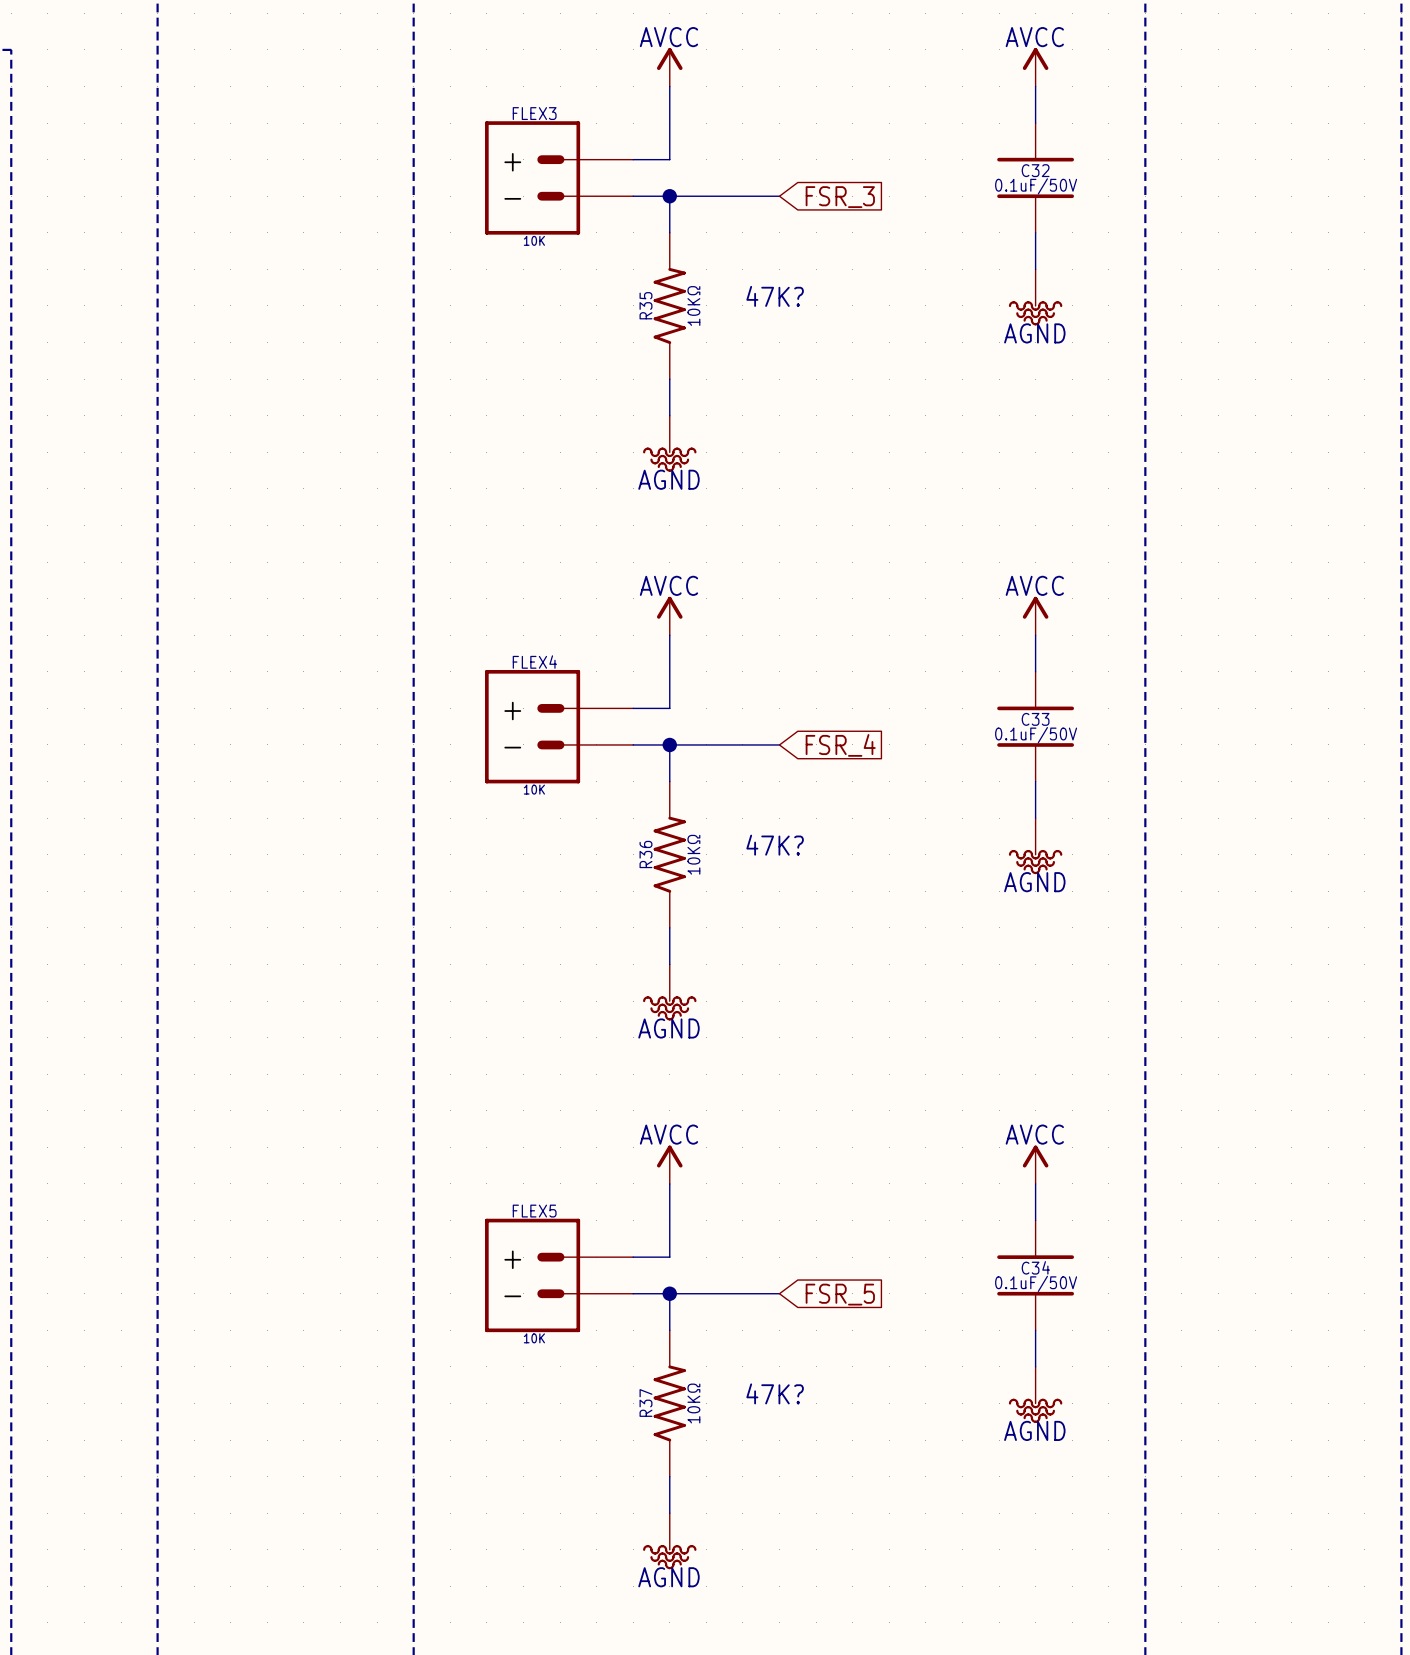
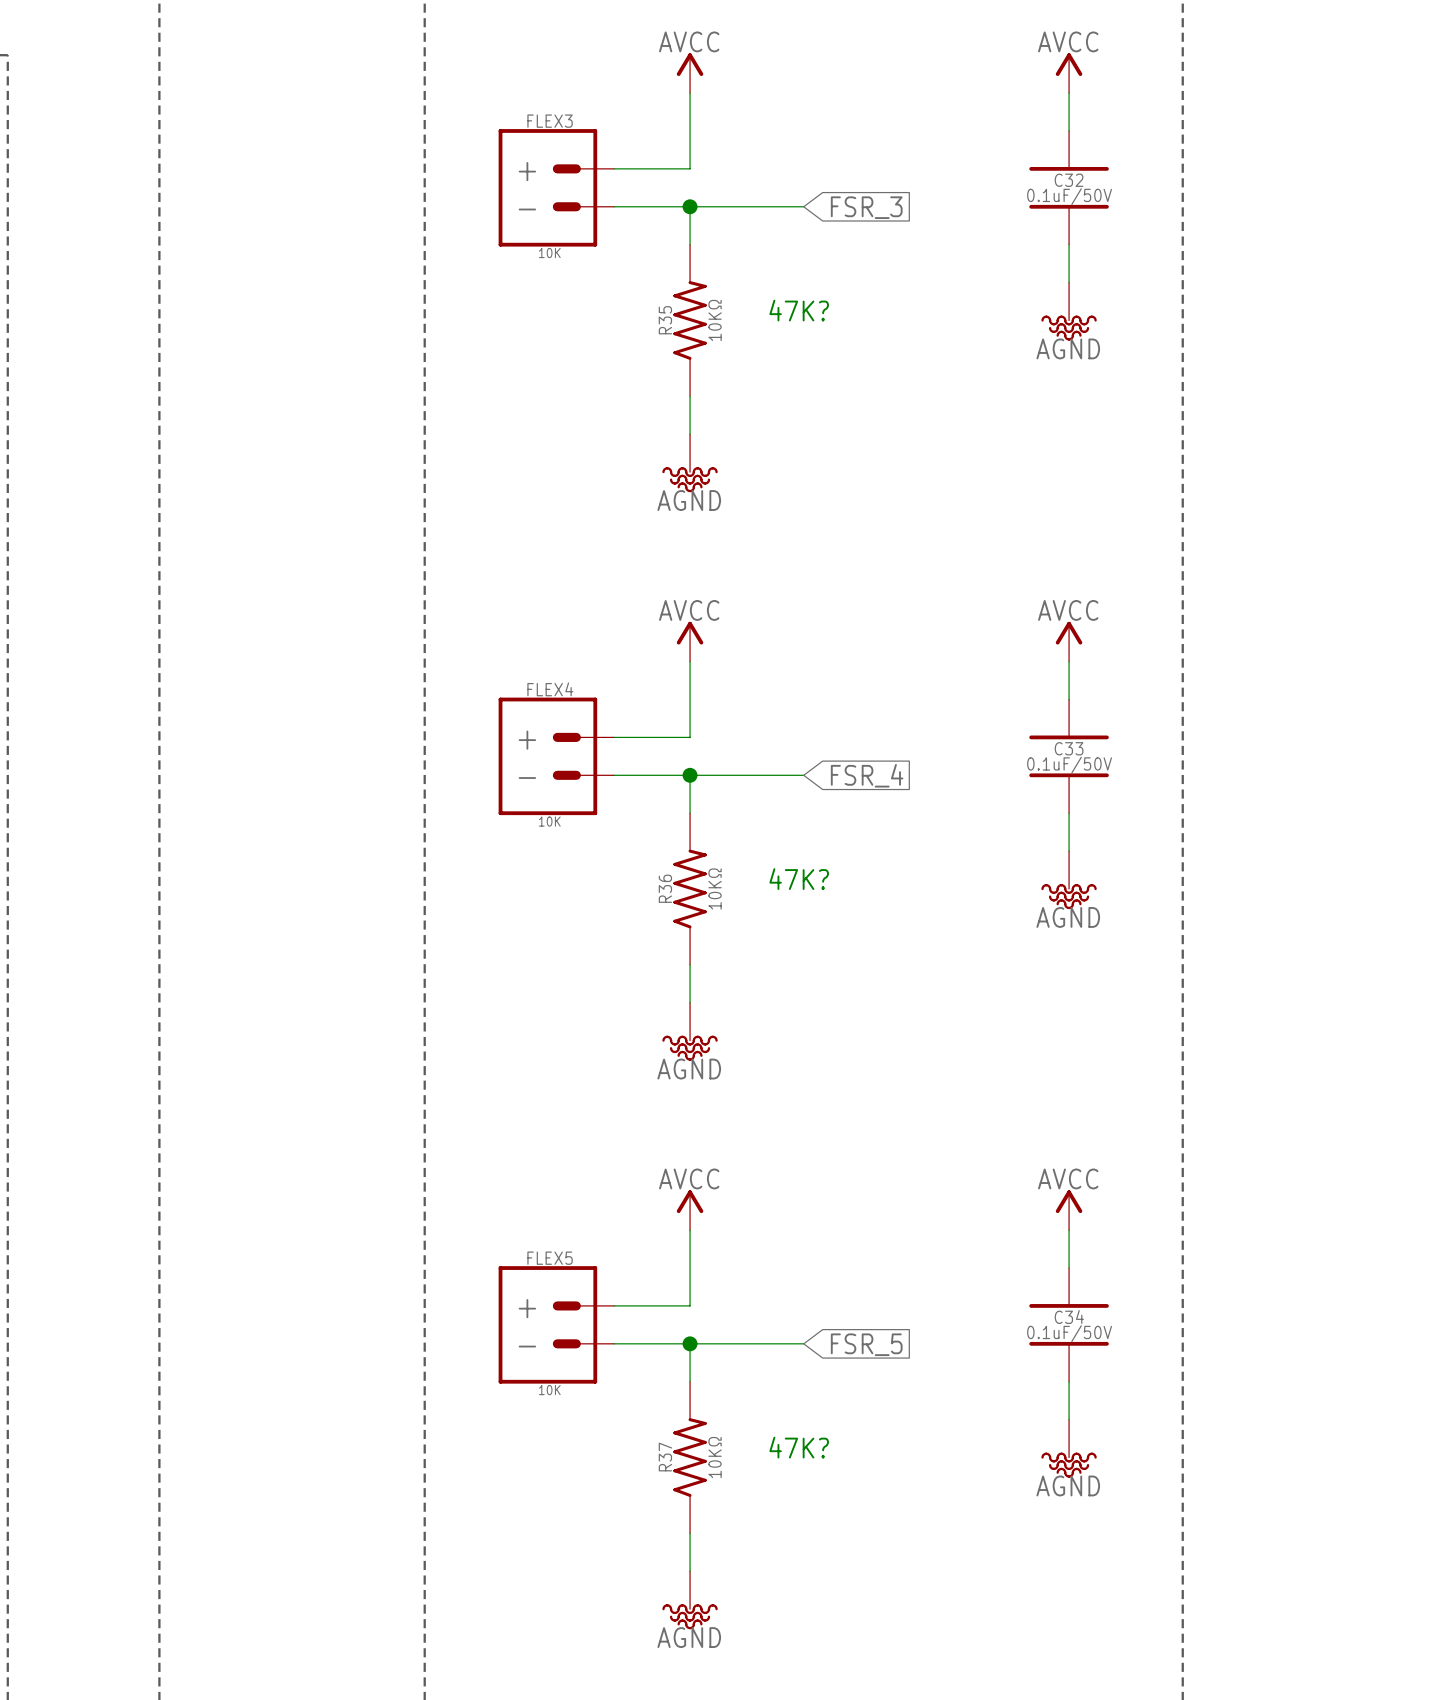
FLEX3 symbol: [485, 121, 634, 235] -> [498, 129, 615, 247]
FLEX4 symbol: [485, 669, 634, 784] -> [498, 697, 615, 816]
FLEX5 symbol: [485, 1218, 634, 1333] -> [498, 1266, 615, 1384]

